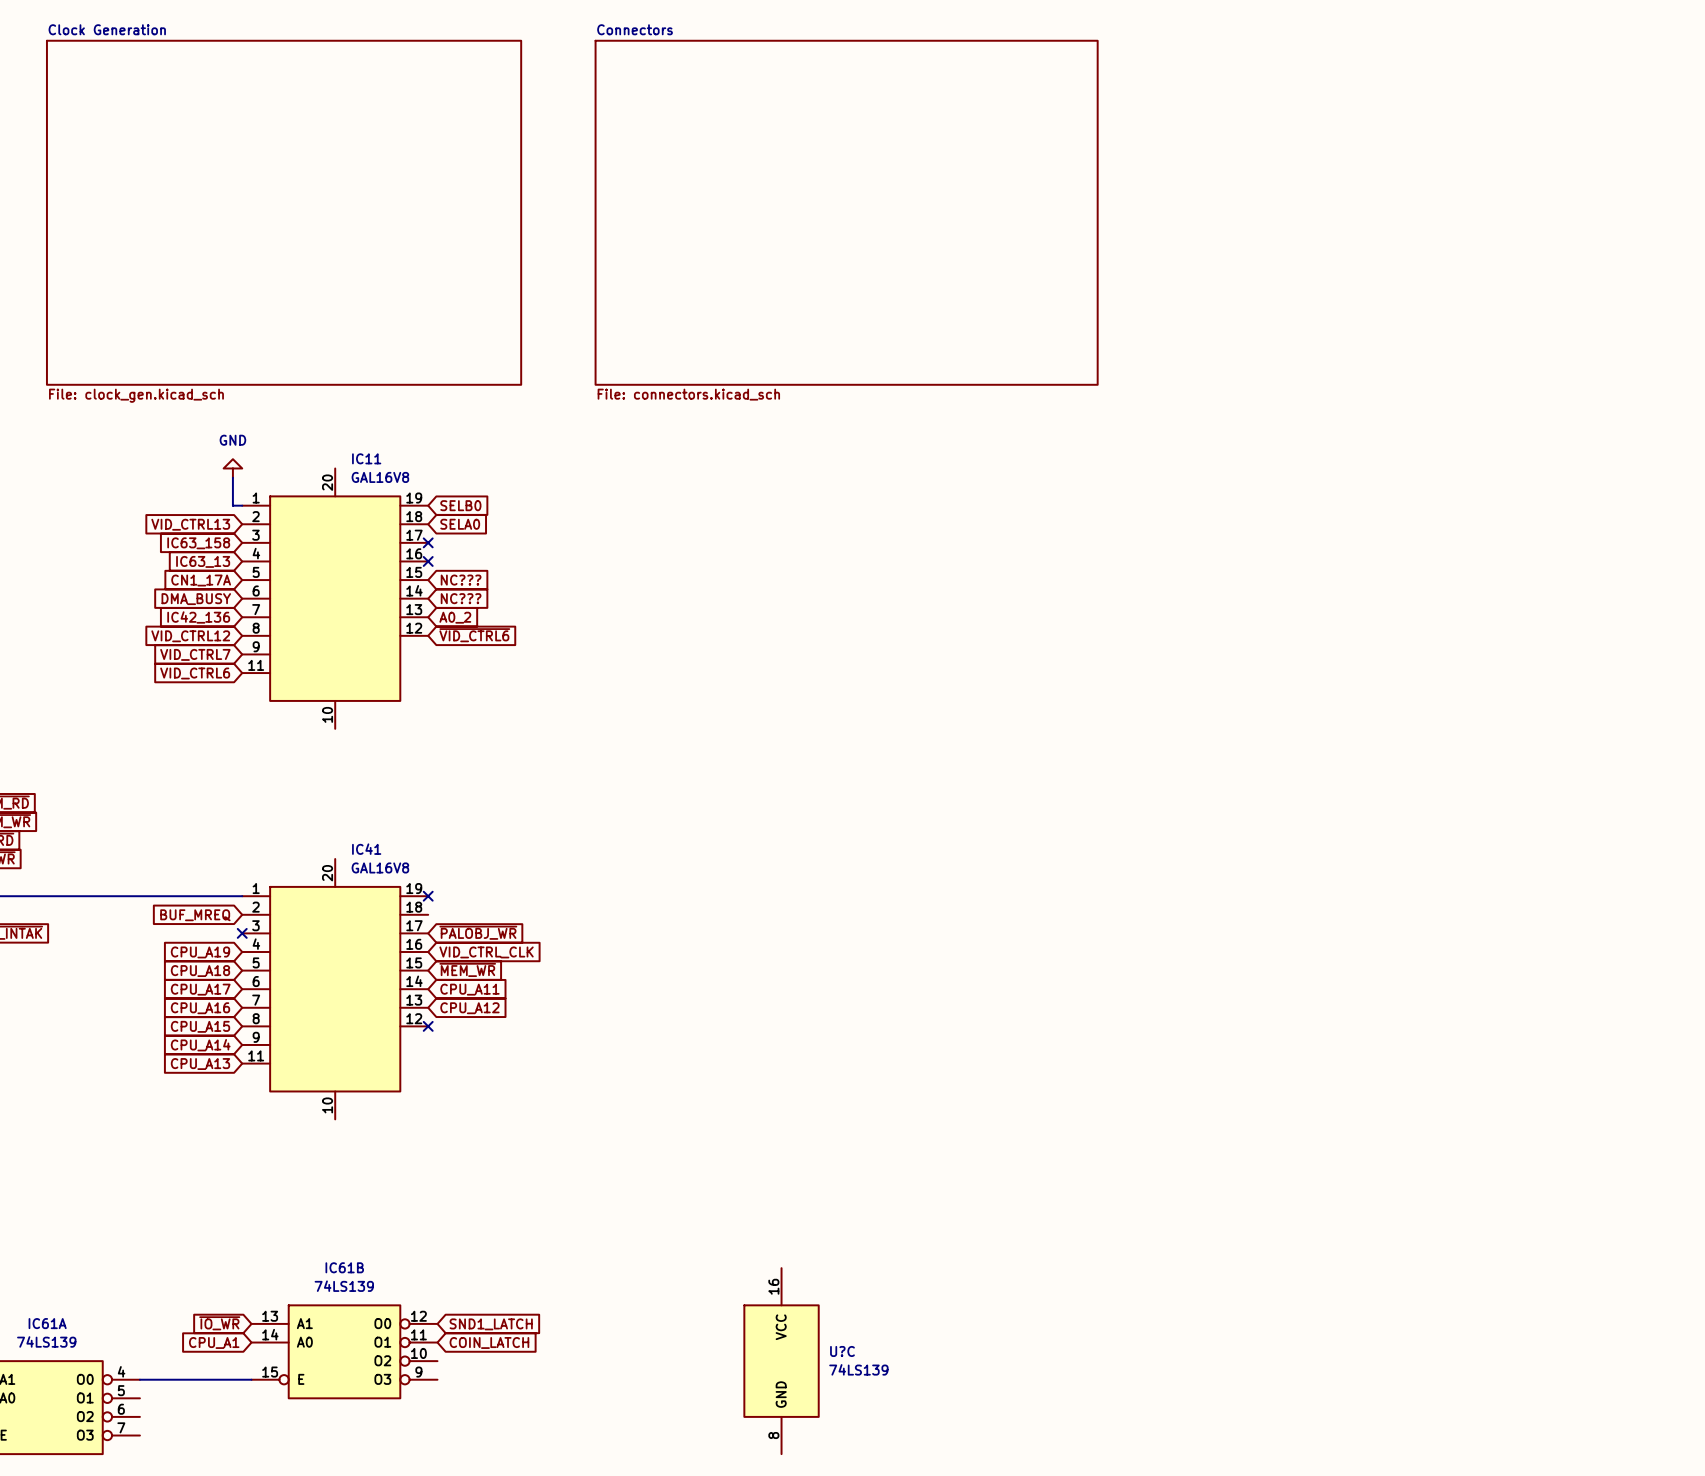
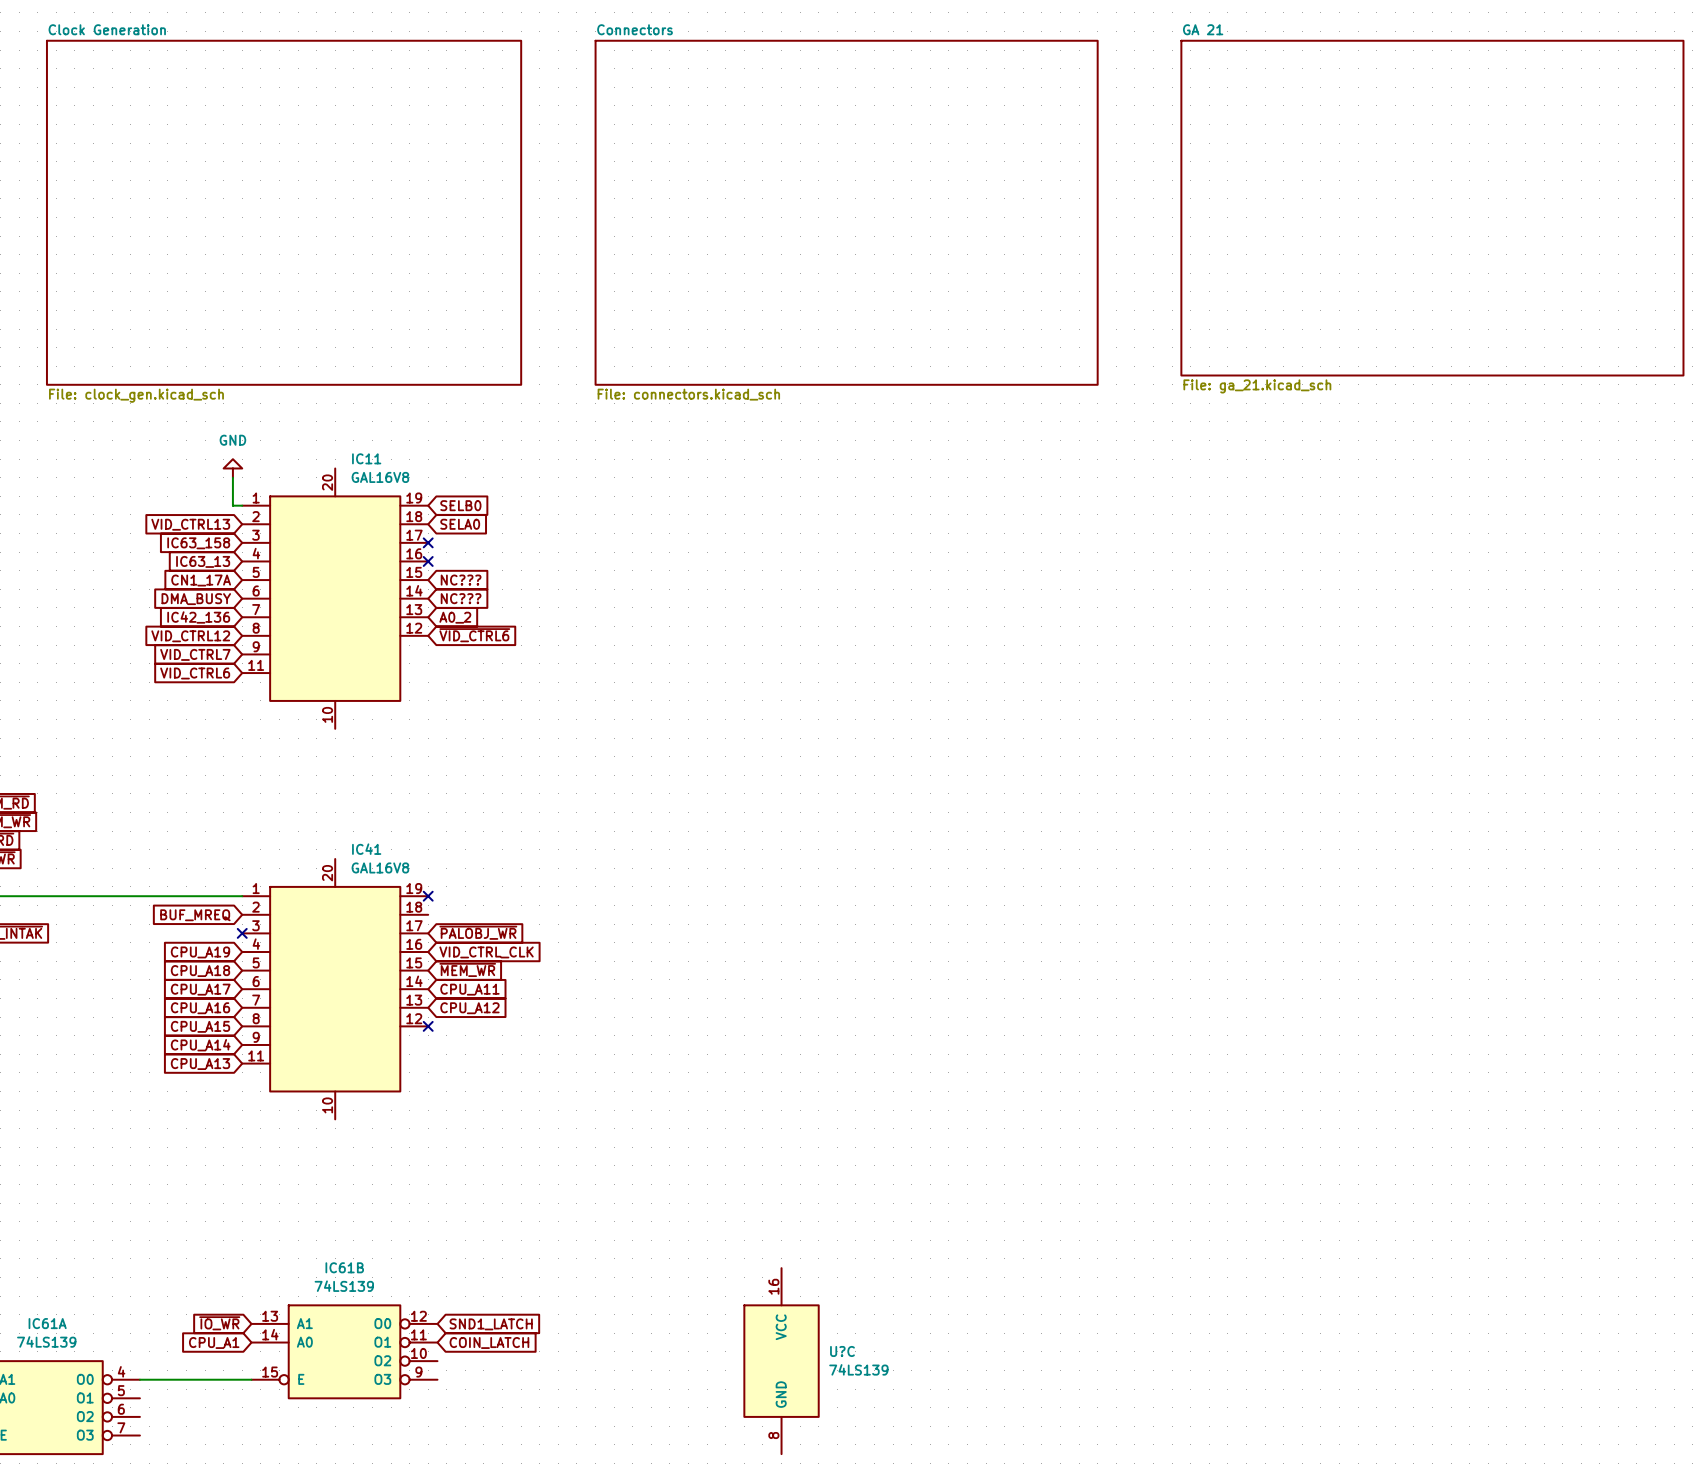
sheet GA 21: none -> File: ga_21.kicad_sch (1432, 208)

